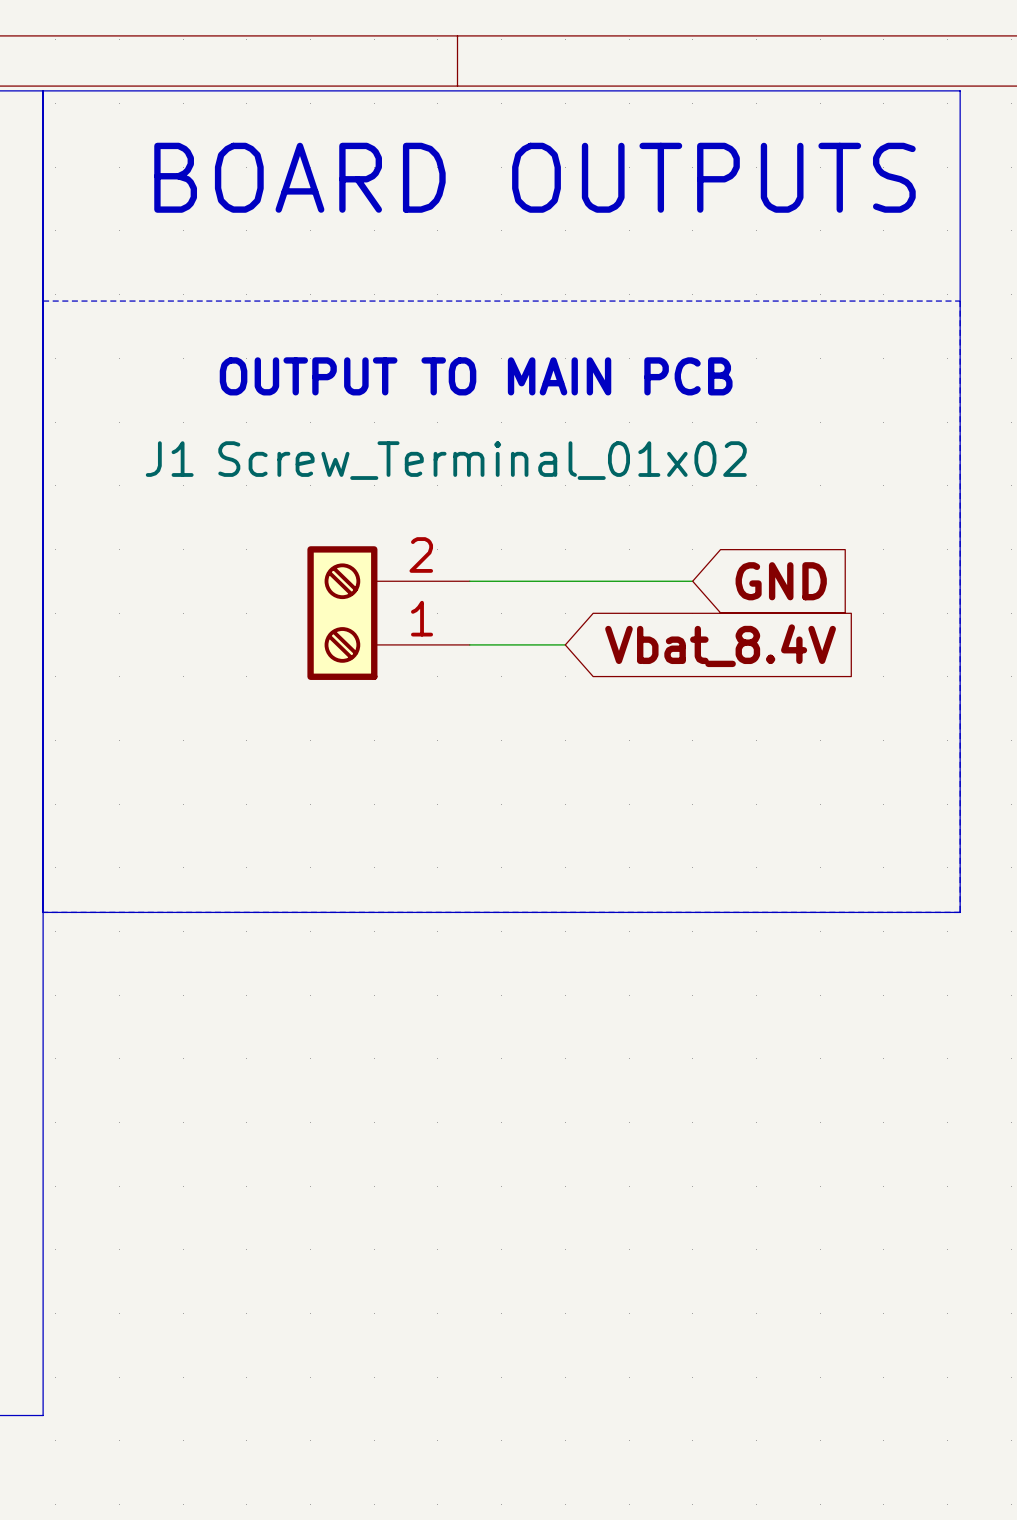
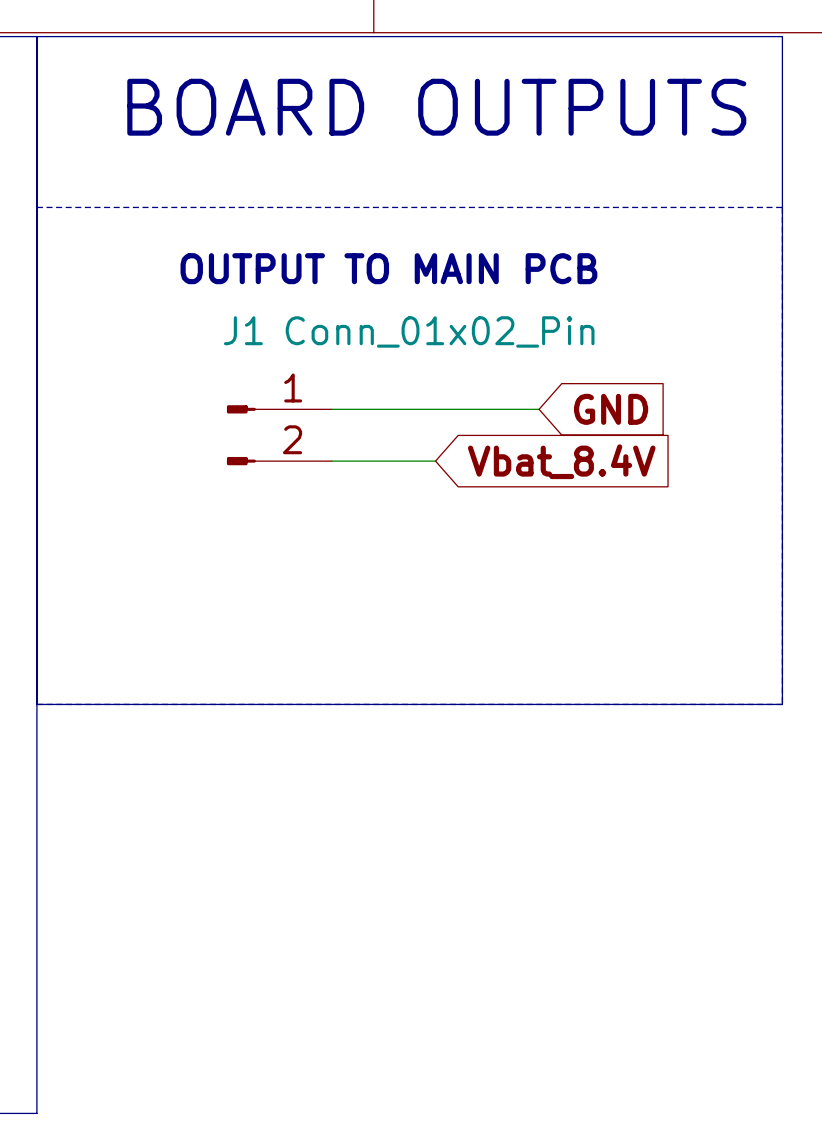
J1 name position: J1 (169, 459) -> J1 (243, 330)
J1 value: Screw_Terminal_01x02 (482, 460) -> Conn_01x02_Pin (440, 331)
J1 symbol: [307, 546, 470, 680] -> [226, 405, 333, 466]
wire: none -> (332, 409) (539, 409)
wire: (469, 581) (692, 581) -> none
global label position: GND (781, 581) -> GND (611, 409)
wire: none -> (332, 461) (435, 461)
wire: (469, 644) (565, 644) -> none
global label position: Vbat_8.4V (720, 645) -> Vbat_8.4V (561, 461)

